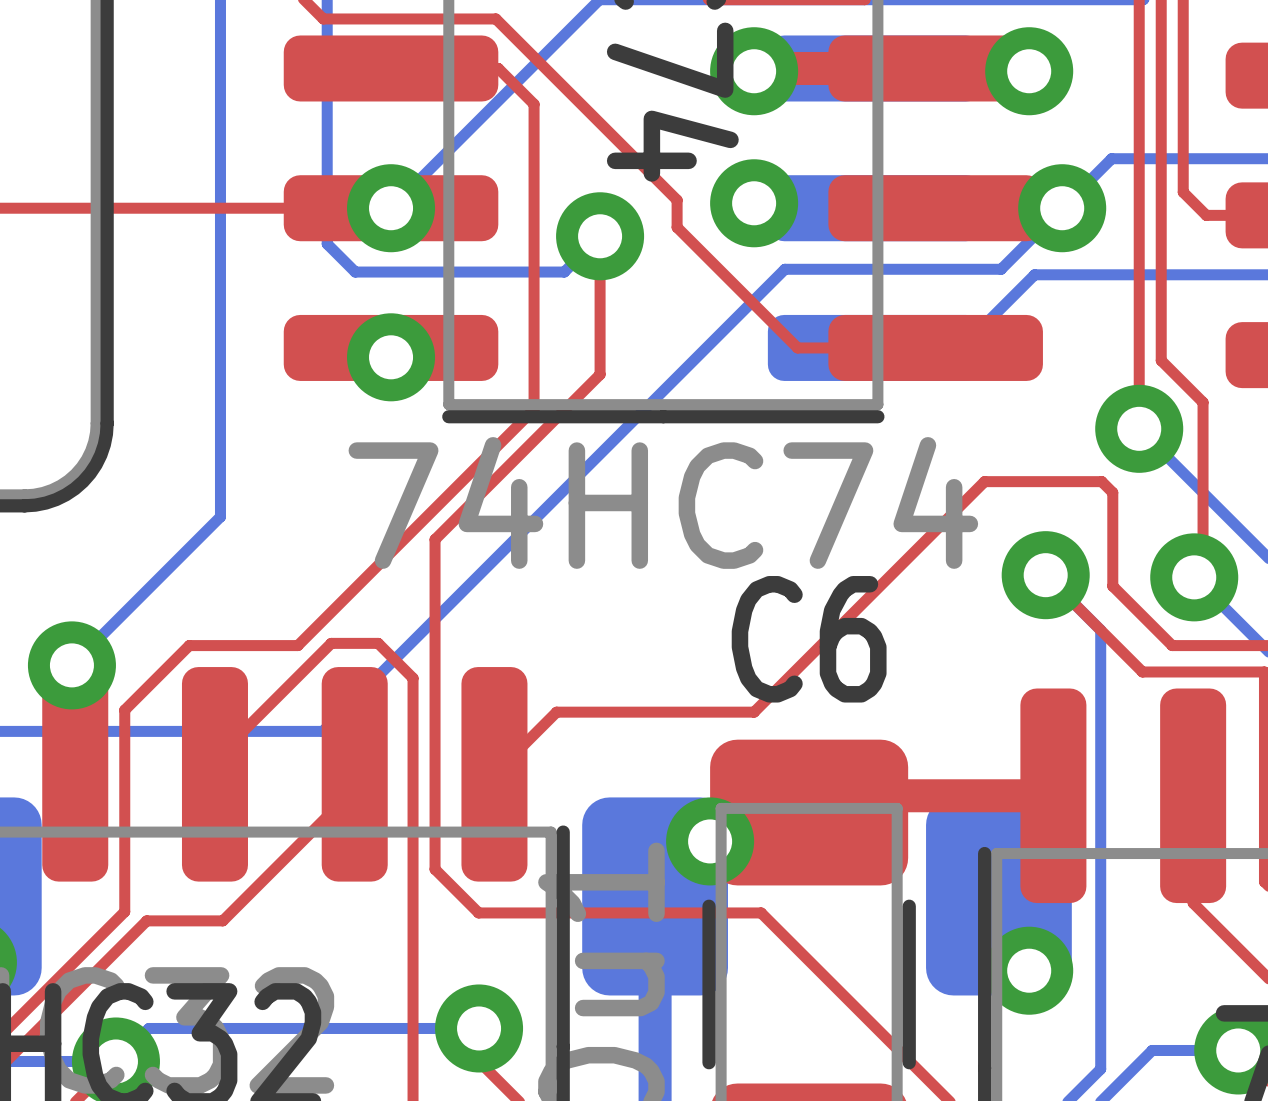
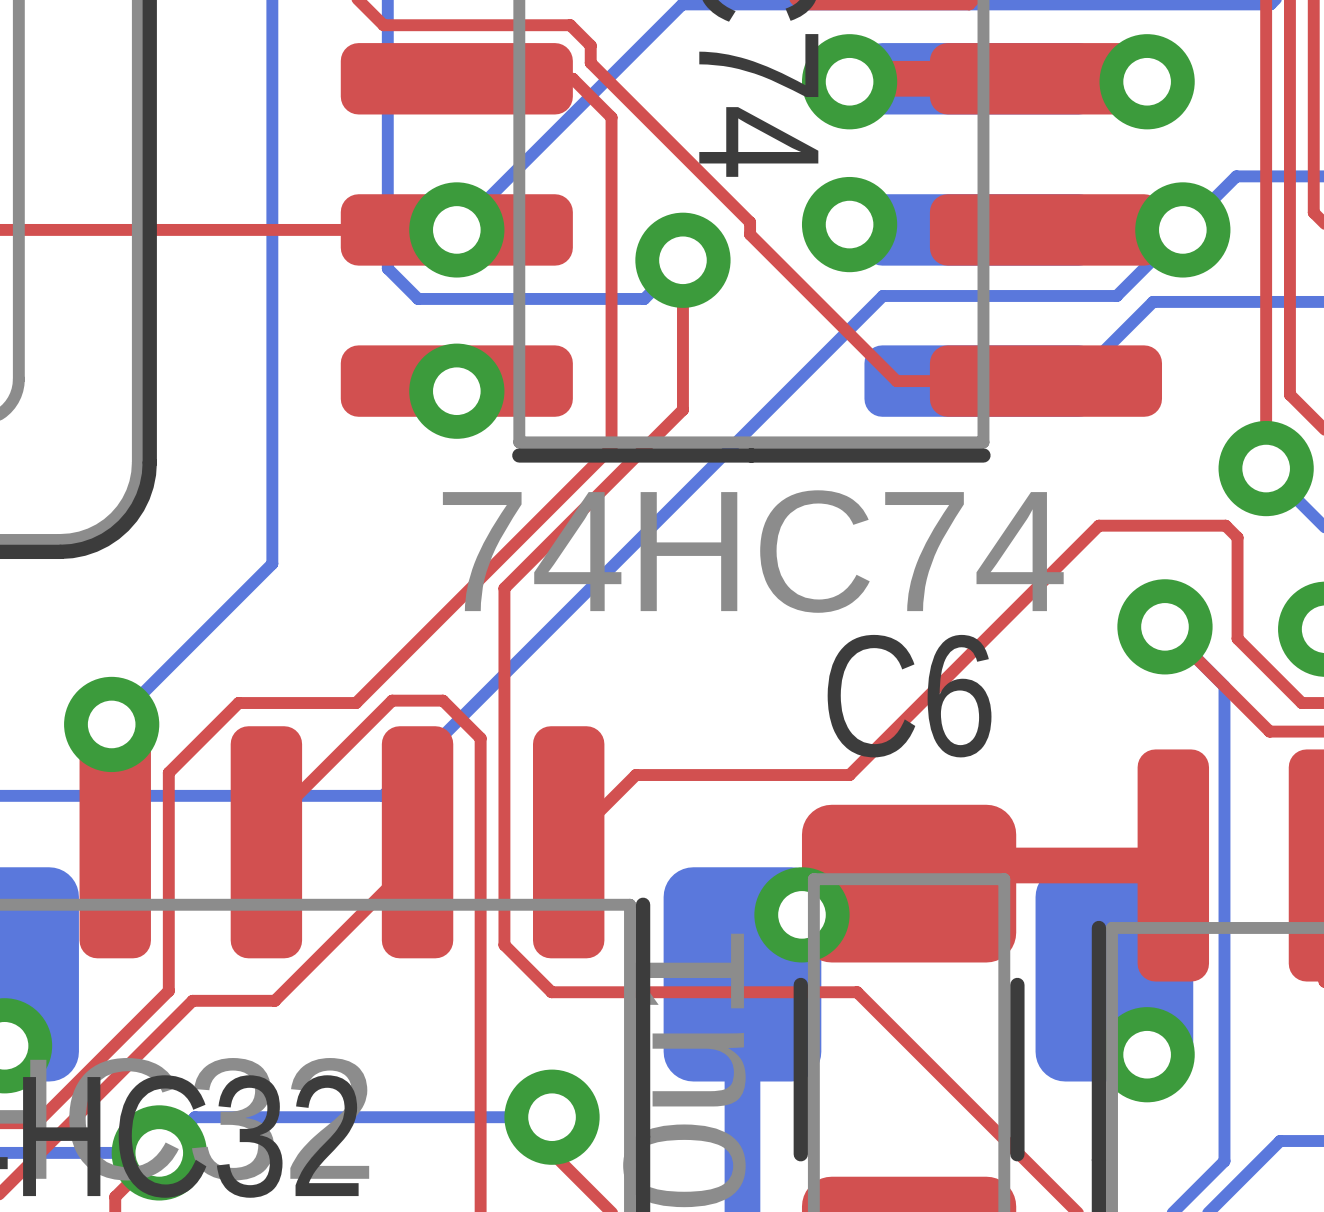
top track: (514, 37) (677, 200) (677, 227) -> (590, 45) (590, 62) (750, 222) (750, 234) (766, 250)

